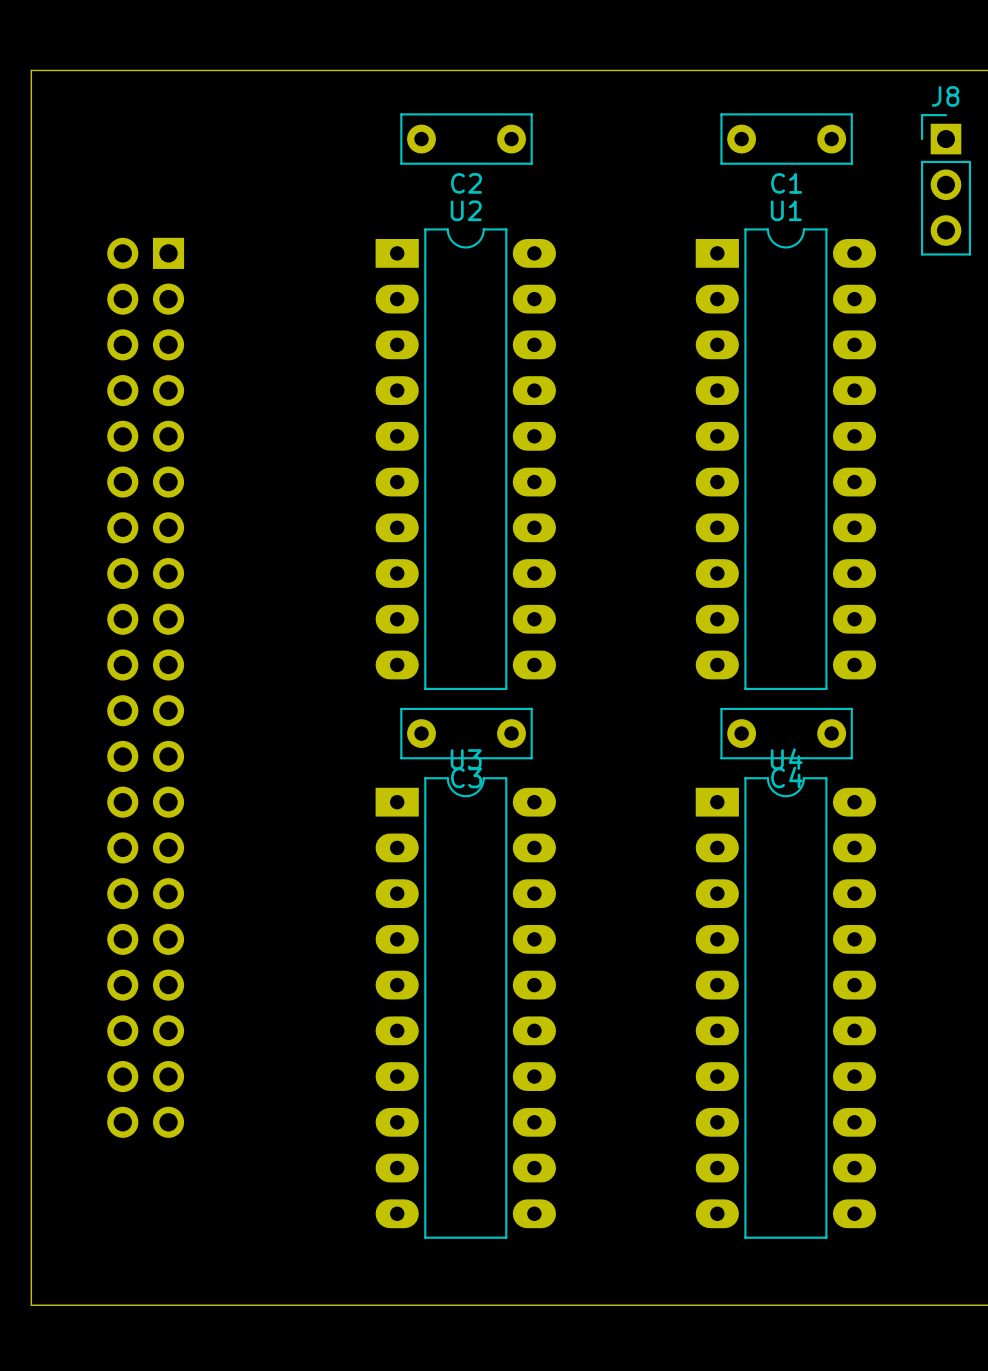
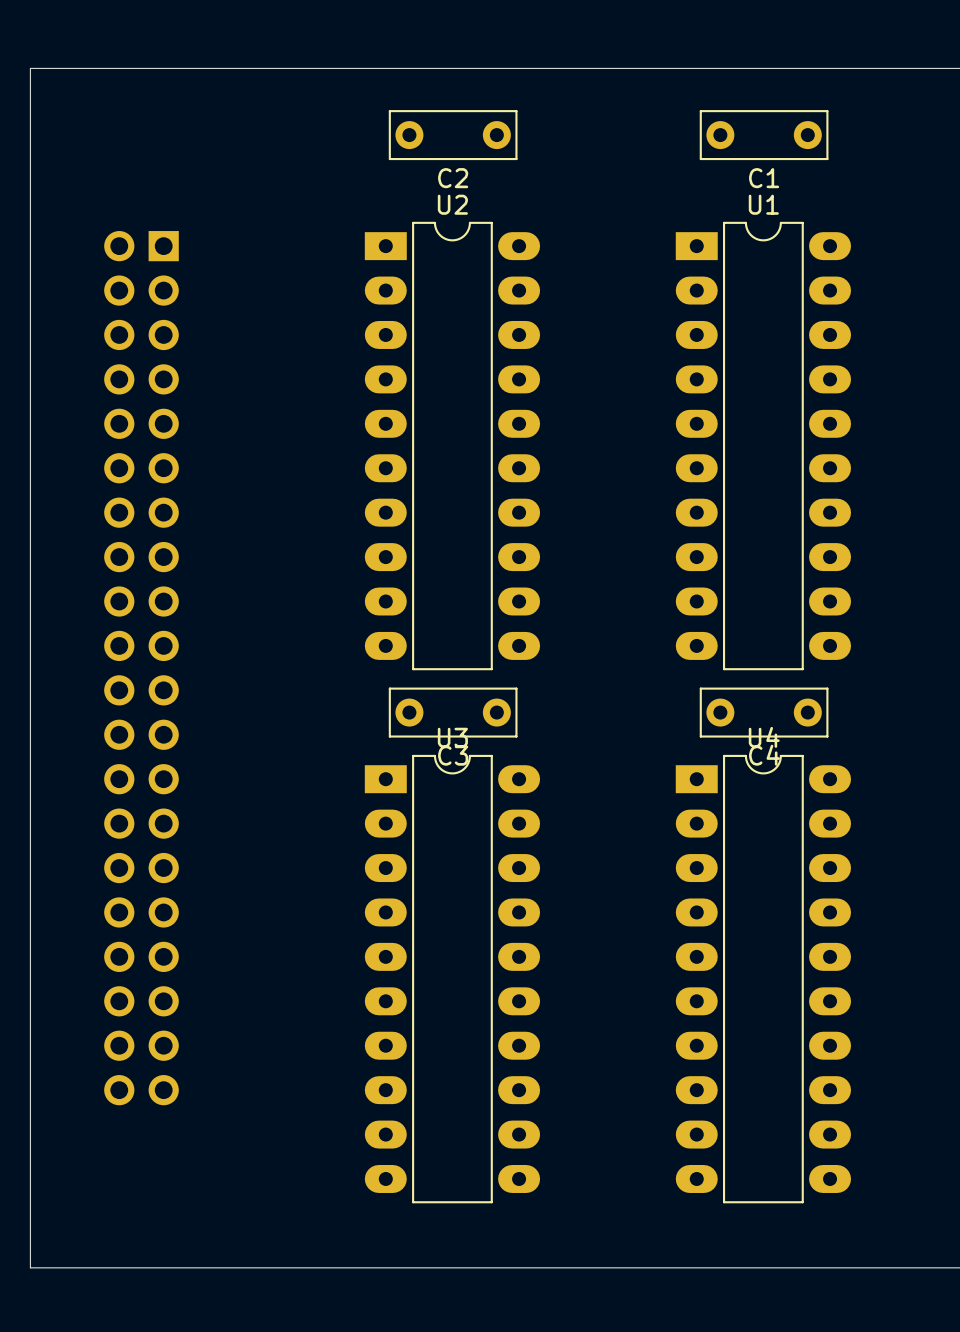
J8: (945, 184) -> none

